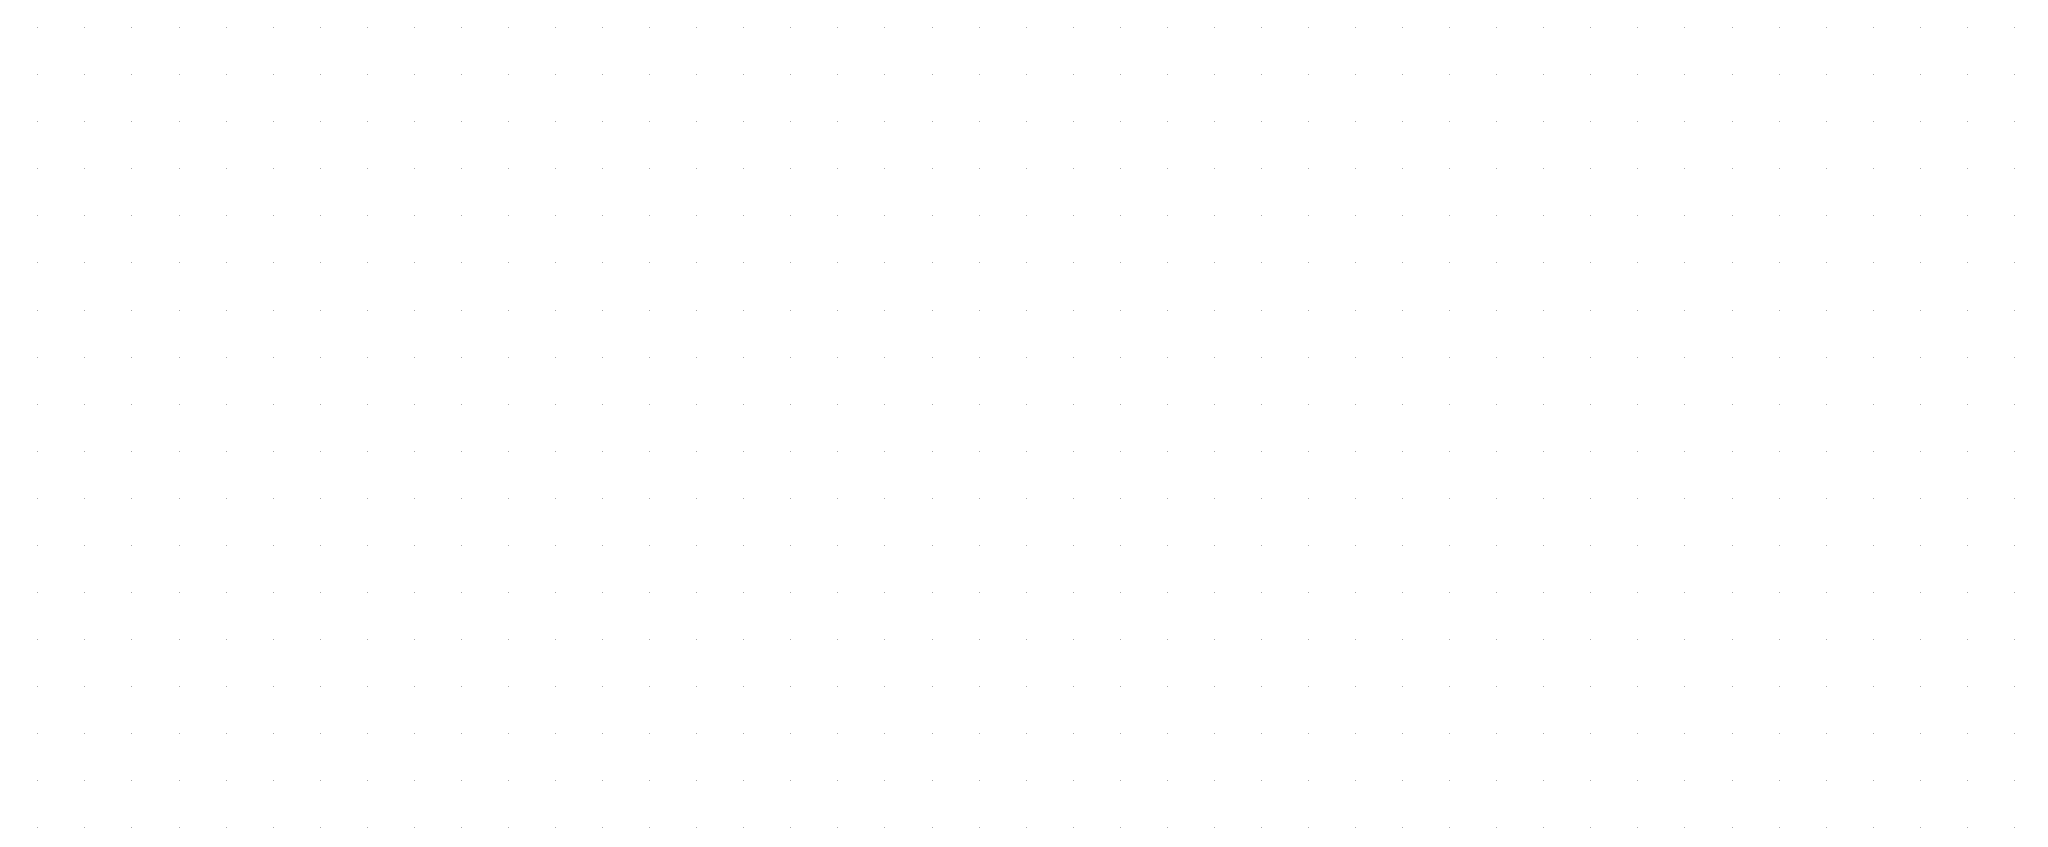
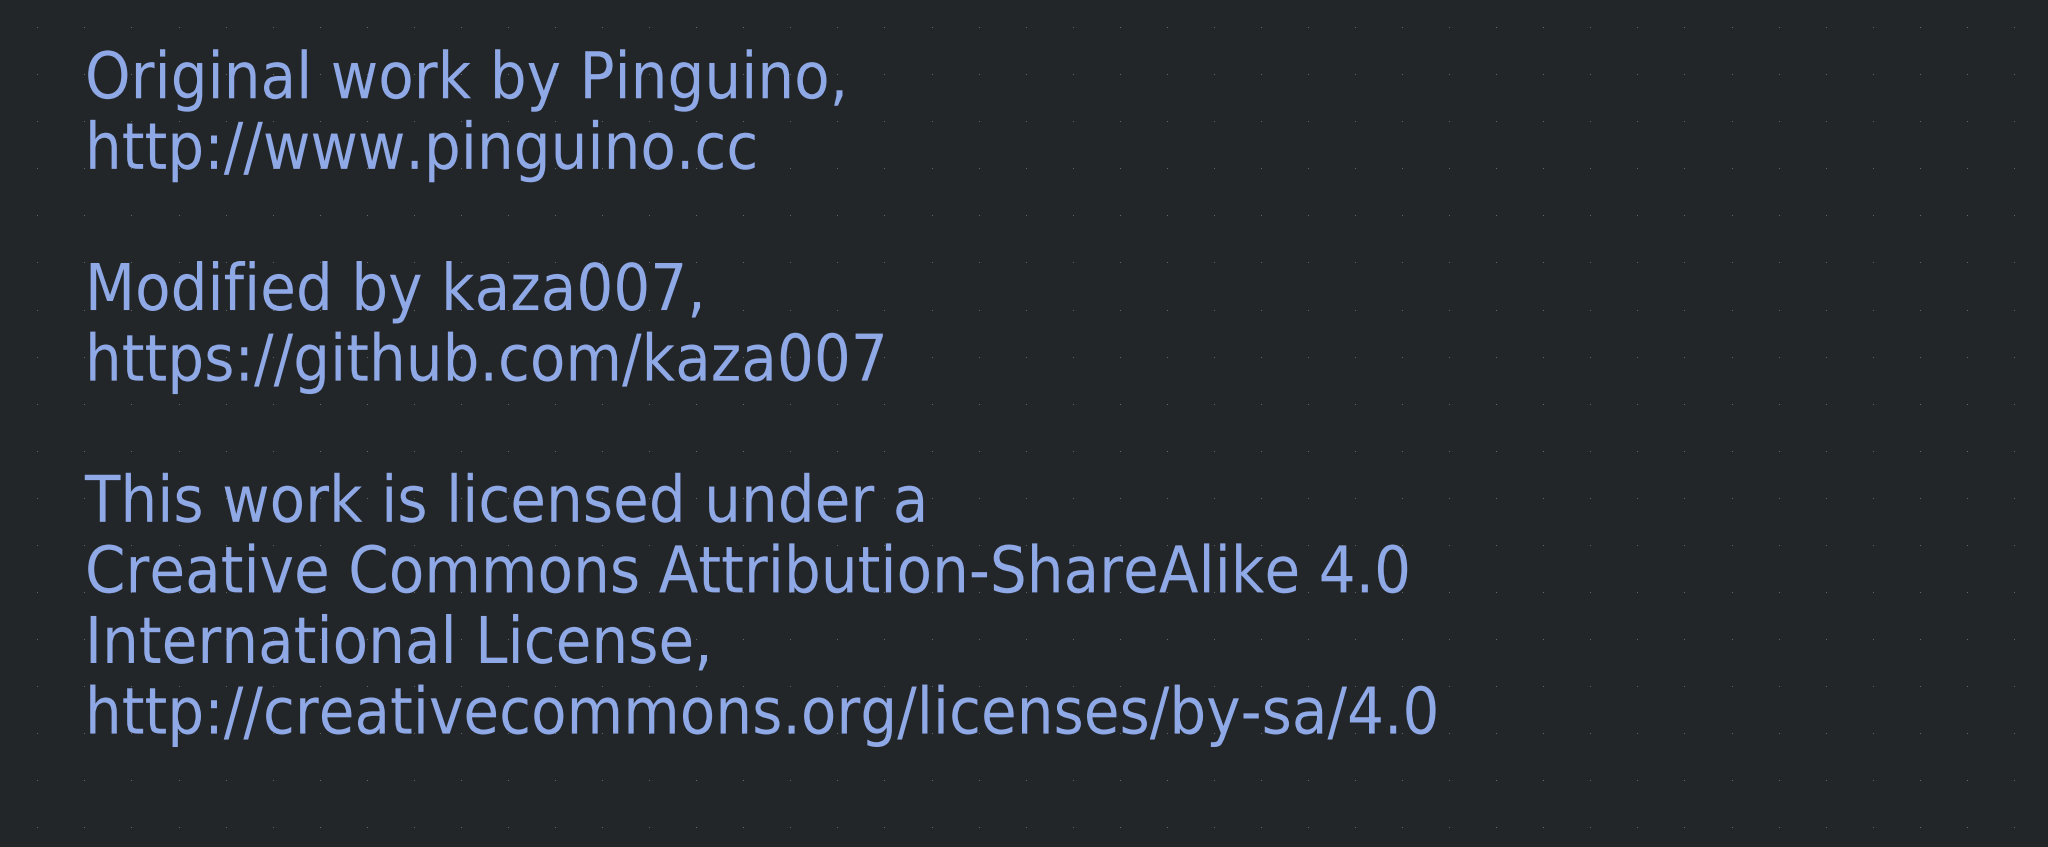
text: none -> Original work by Pinguino, (465, 80)
text: none -> http://www.pinguino.cc (422, 151)
text: none -> Modified by kaza007, (395, 292)
text: none -> https://github.com/kaza007 (486, 362)
text: none -> This work is licensed under a (503, 497)
text: none -> Creative Commons Attribution-ShareAlike 4.0 (747, 568)
text: none -> International License, (398, 642)
text: none -> http://creativecommons.org/licenses/by-sa/4.0 (762, 715)

